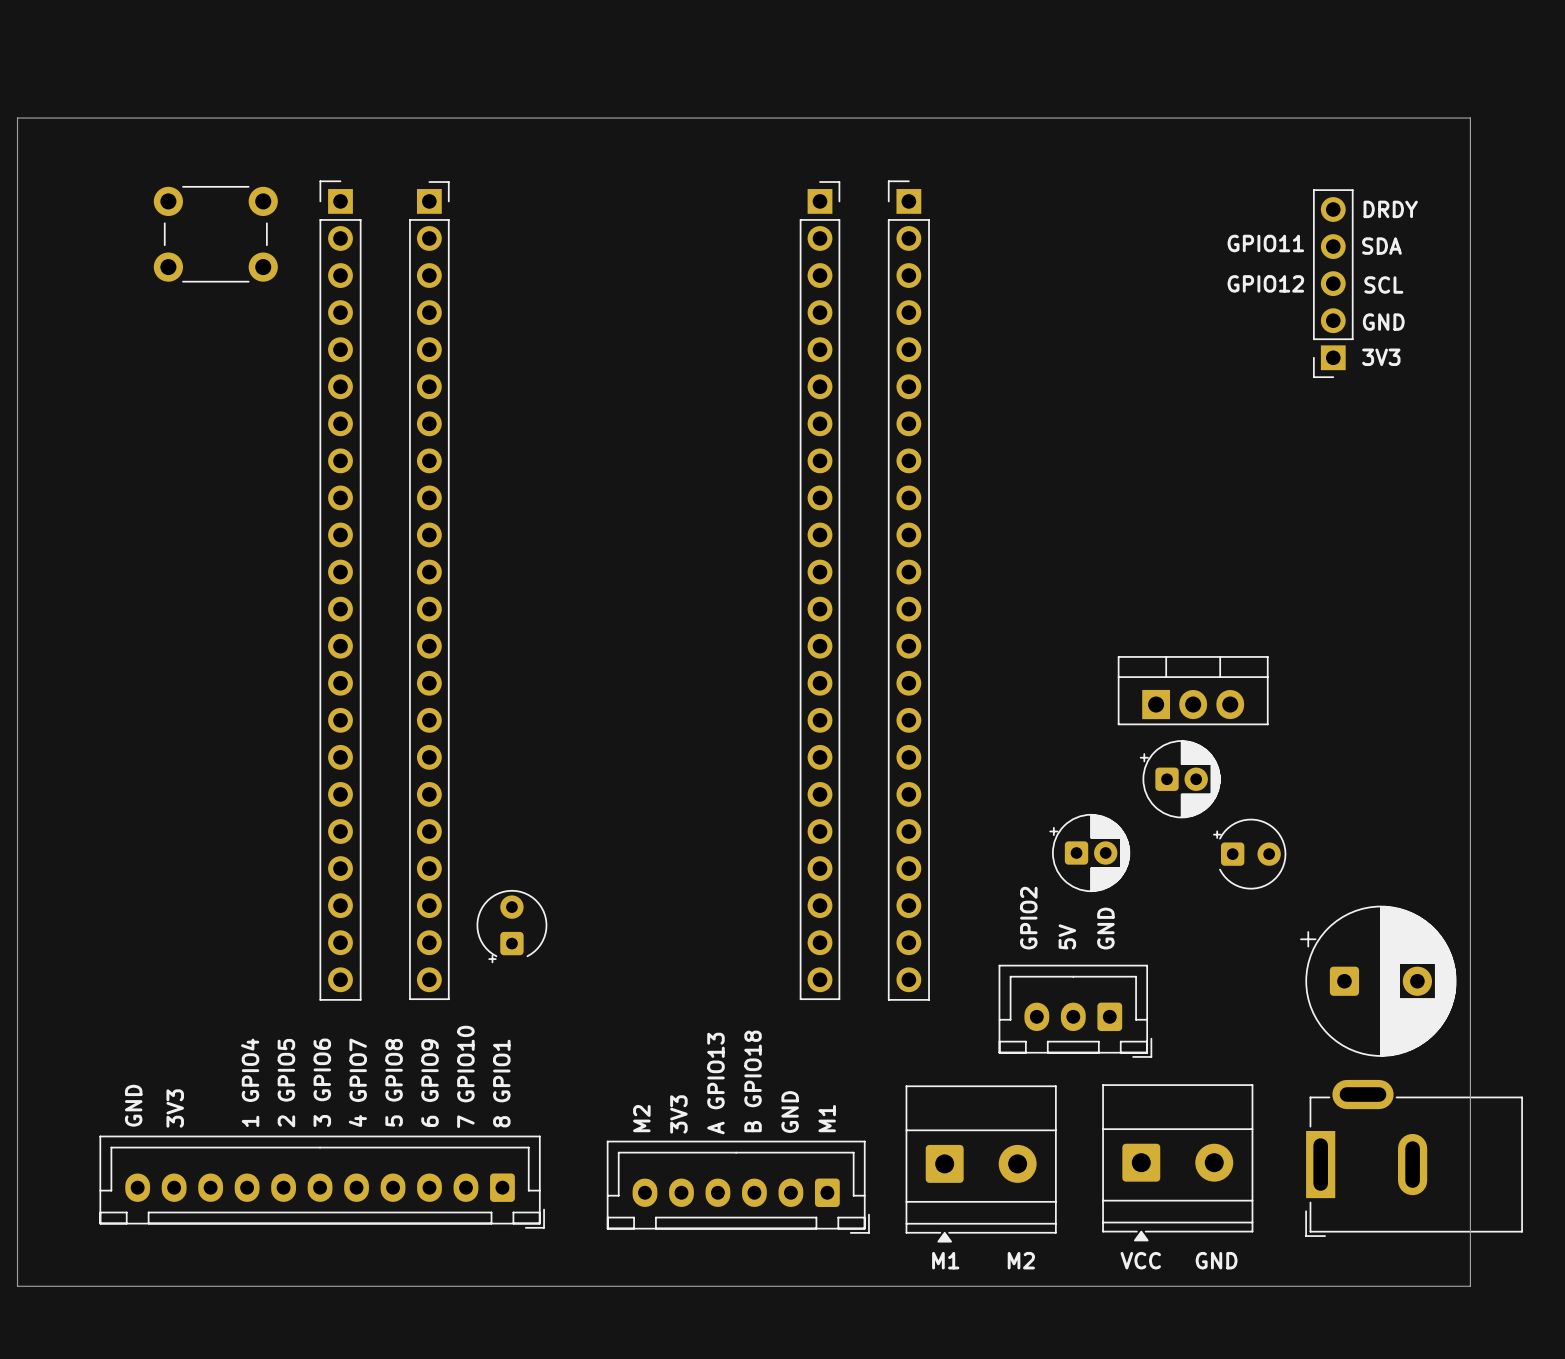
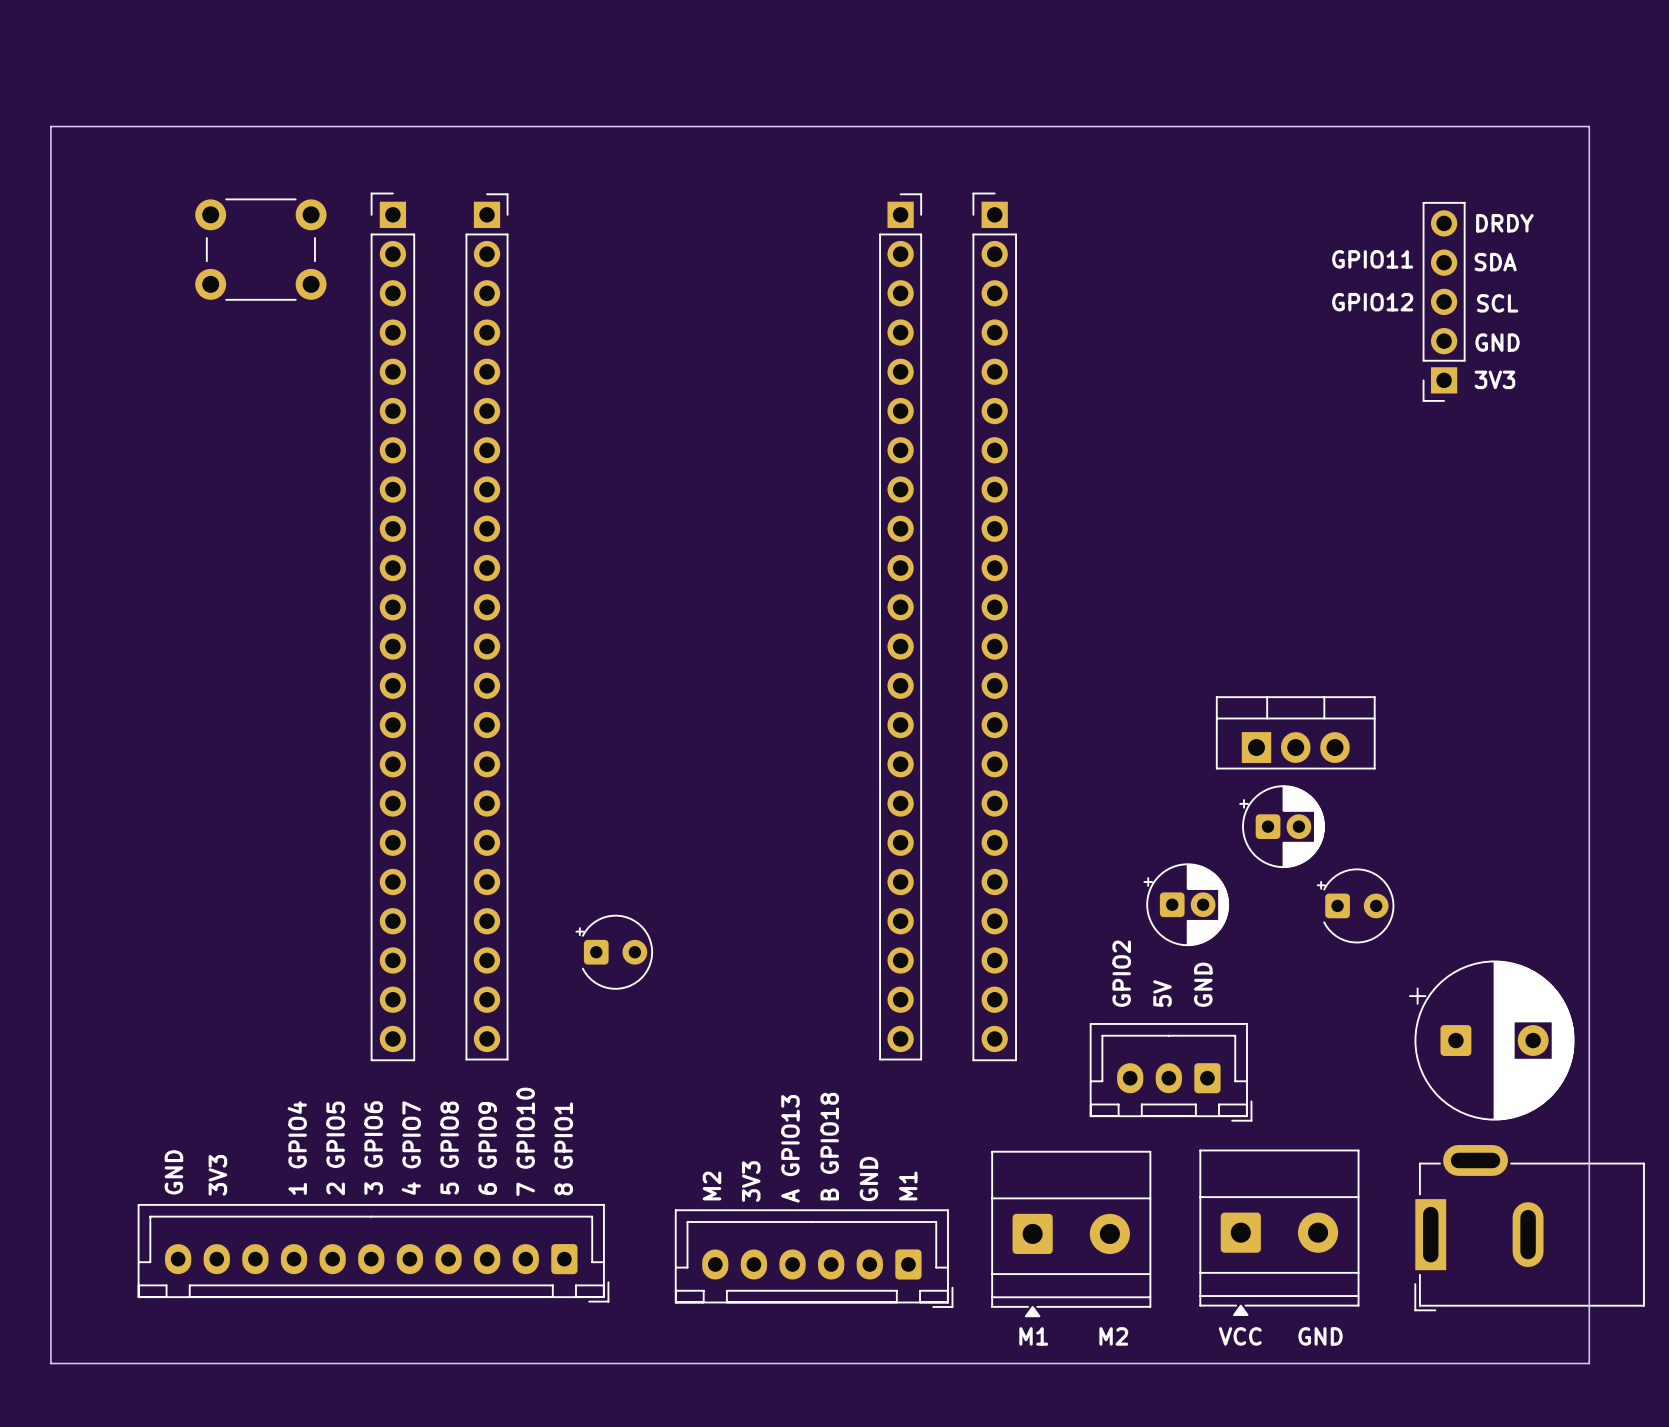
part rotation: 0° (511, 926) -> 90° clockwise (614, 952)
part position: (511, 926) -> (614, 952)

